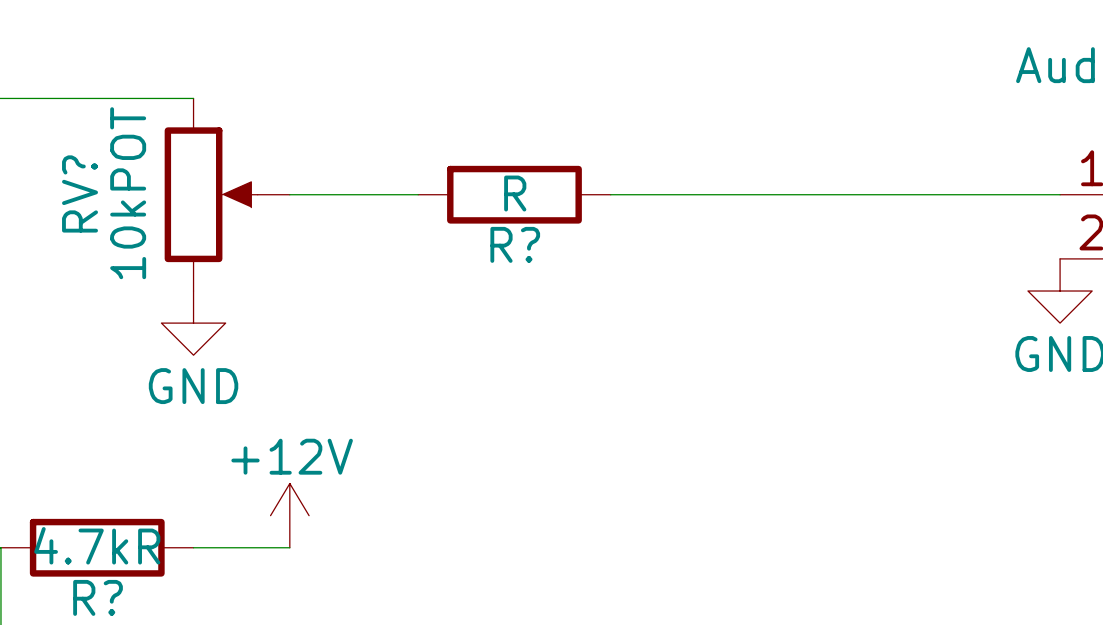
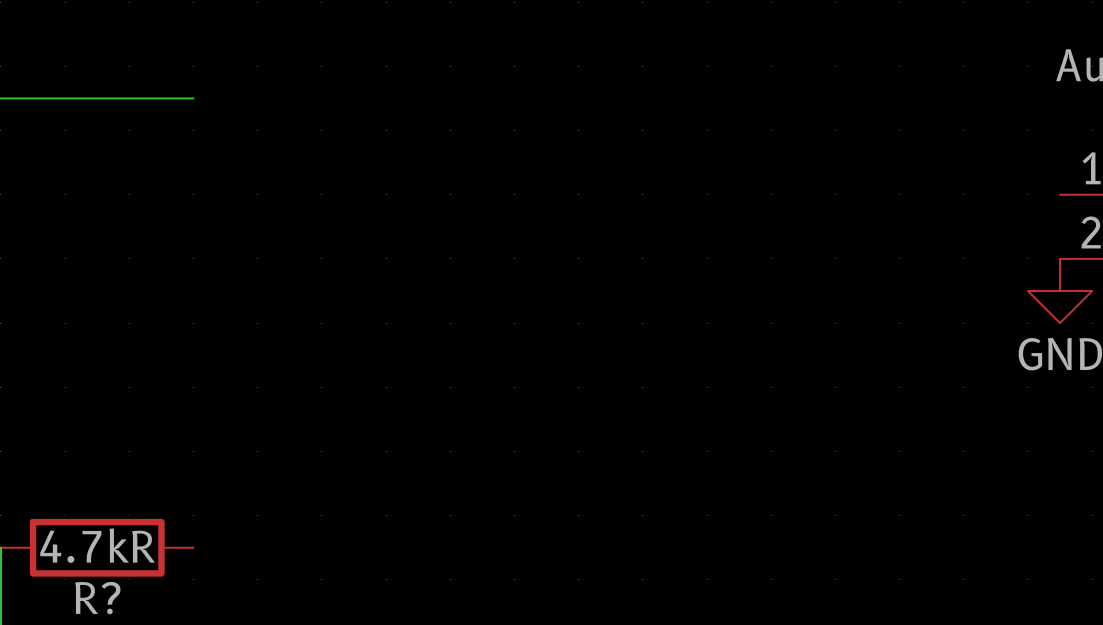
RV?: 10kPOT (227, 194) -> none
wire: (289, 194) (418, 194) -> none
R?: R (514, 194) -> none
wire: (610, 194) (1060, 194) -> none
power symbol: GND (193, 323) -> none
power symbol: +12V (289, 515) -> none
wire: (193, 547) (289, 547) -> none

